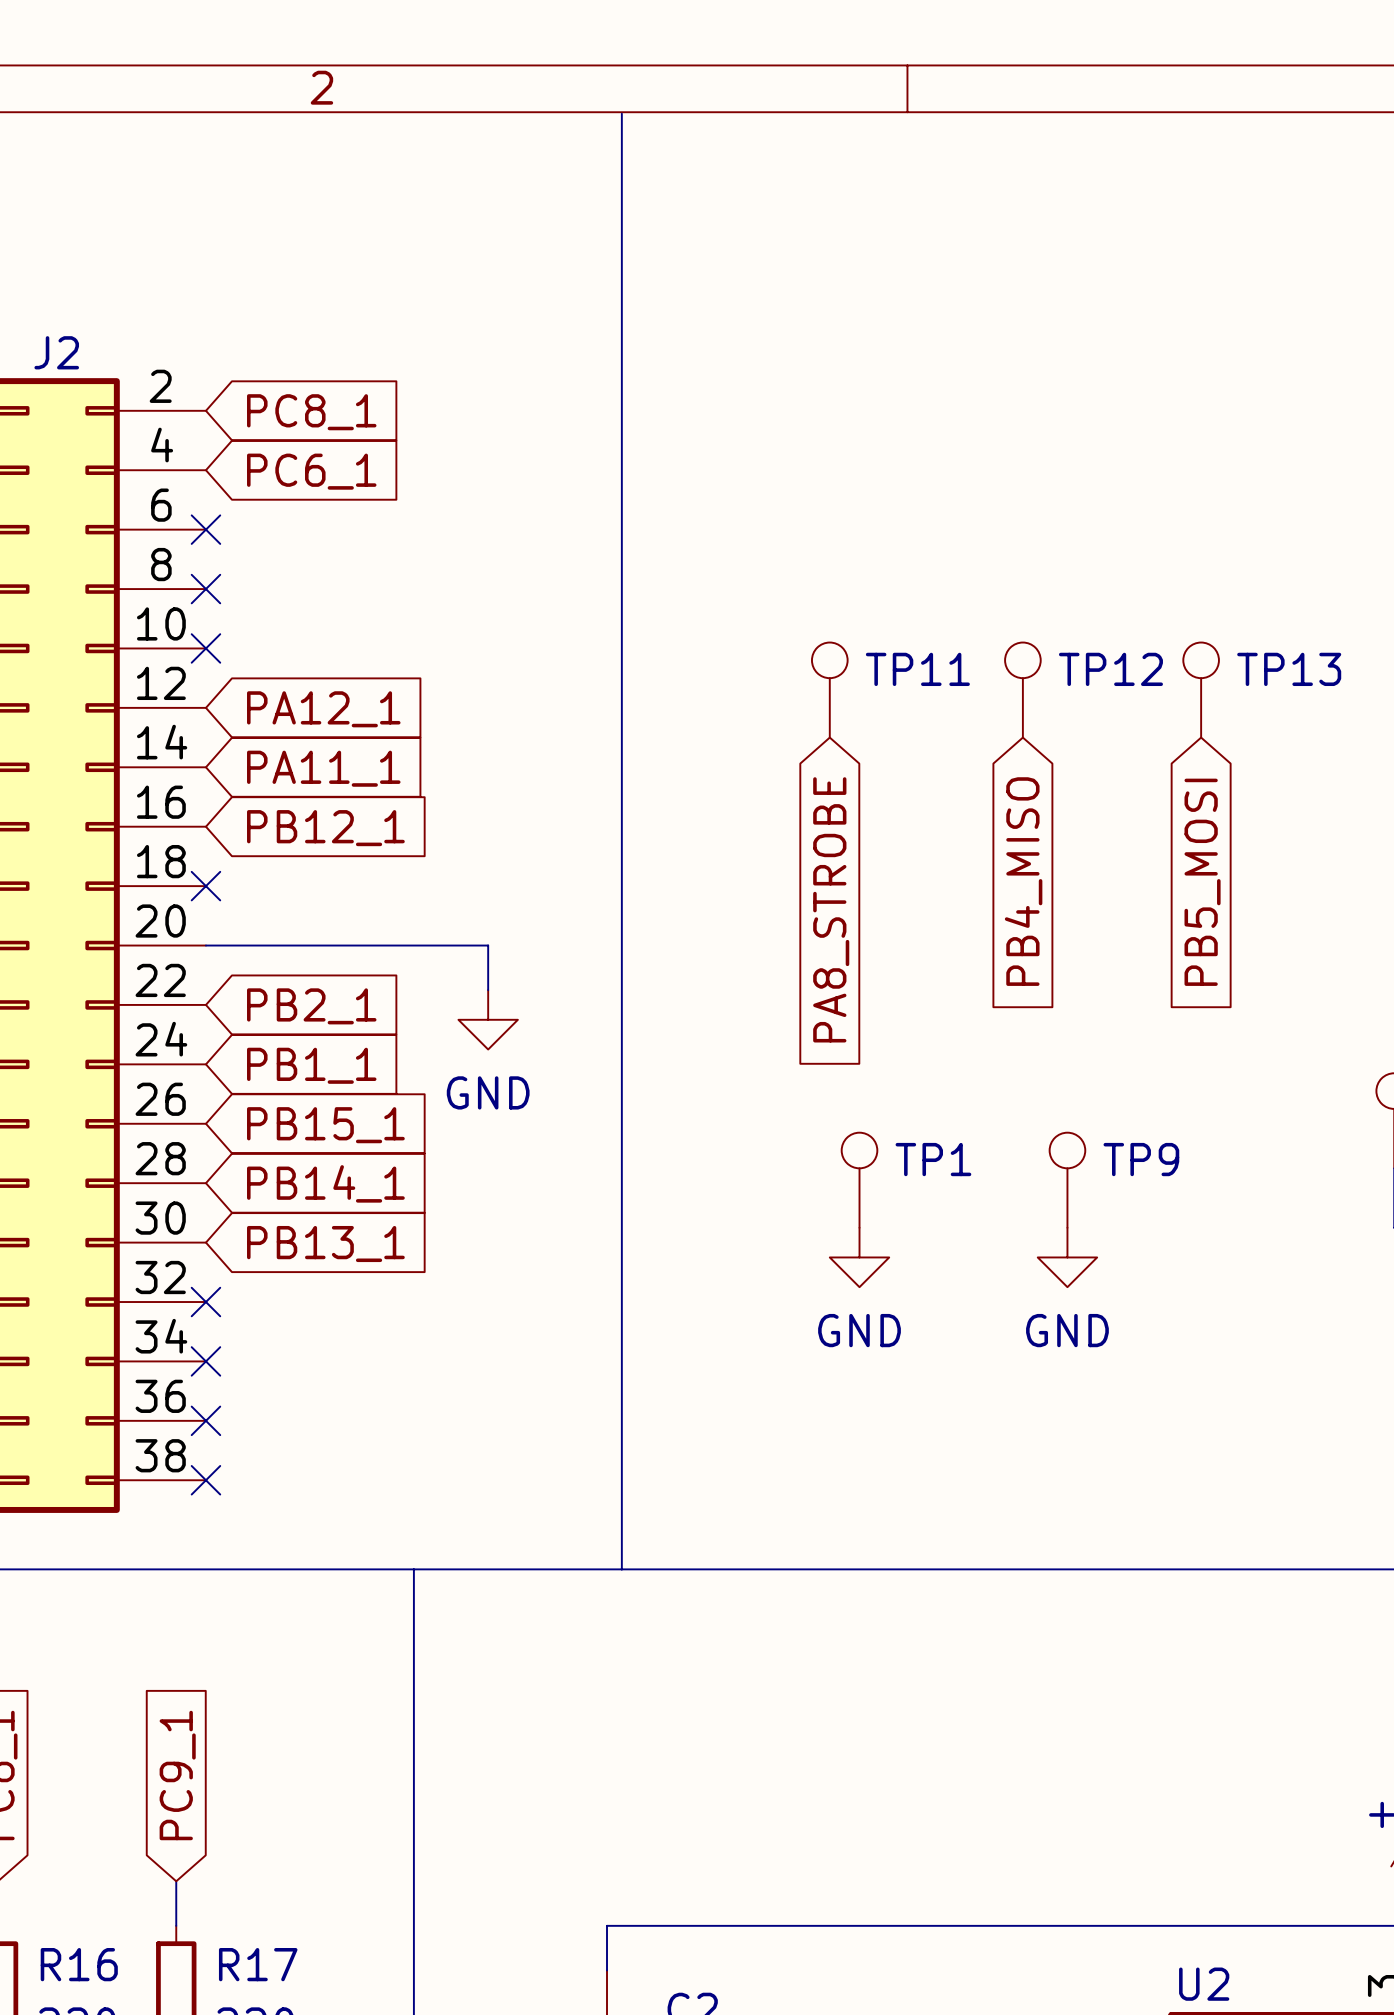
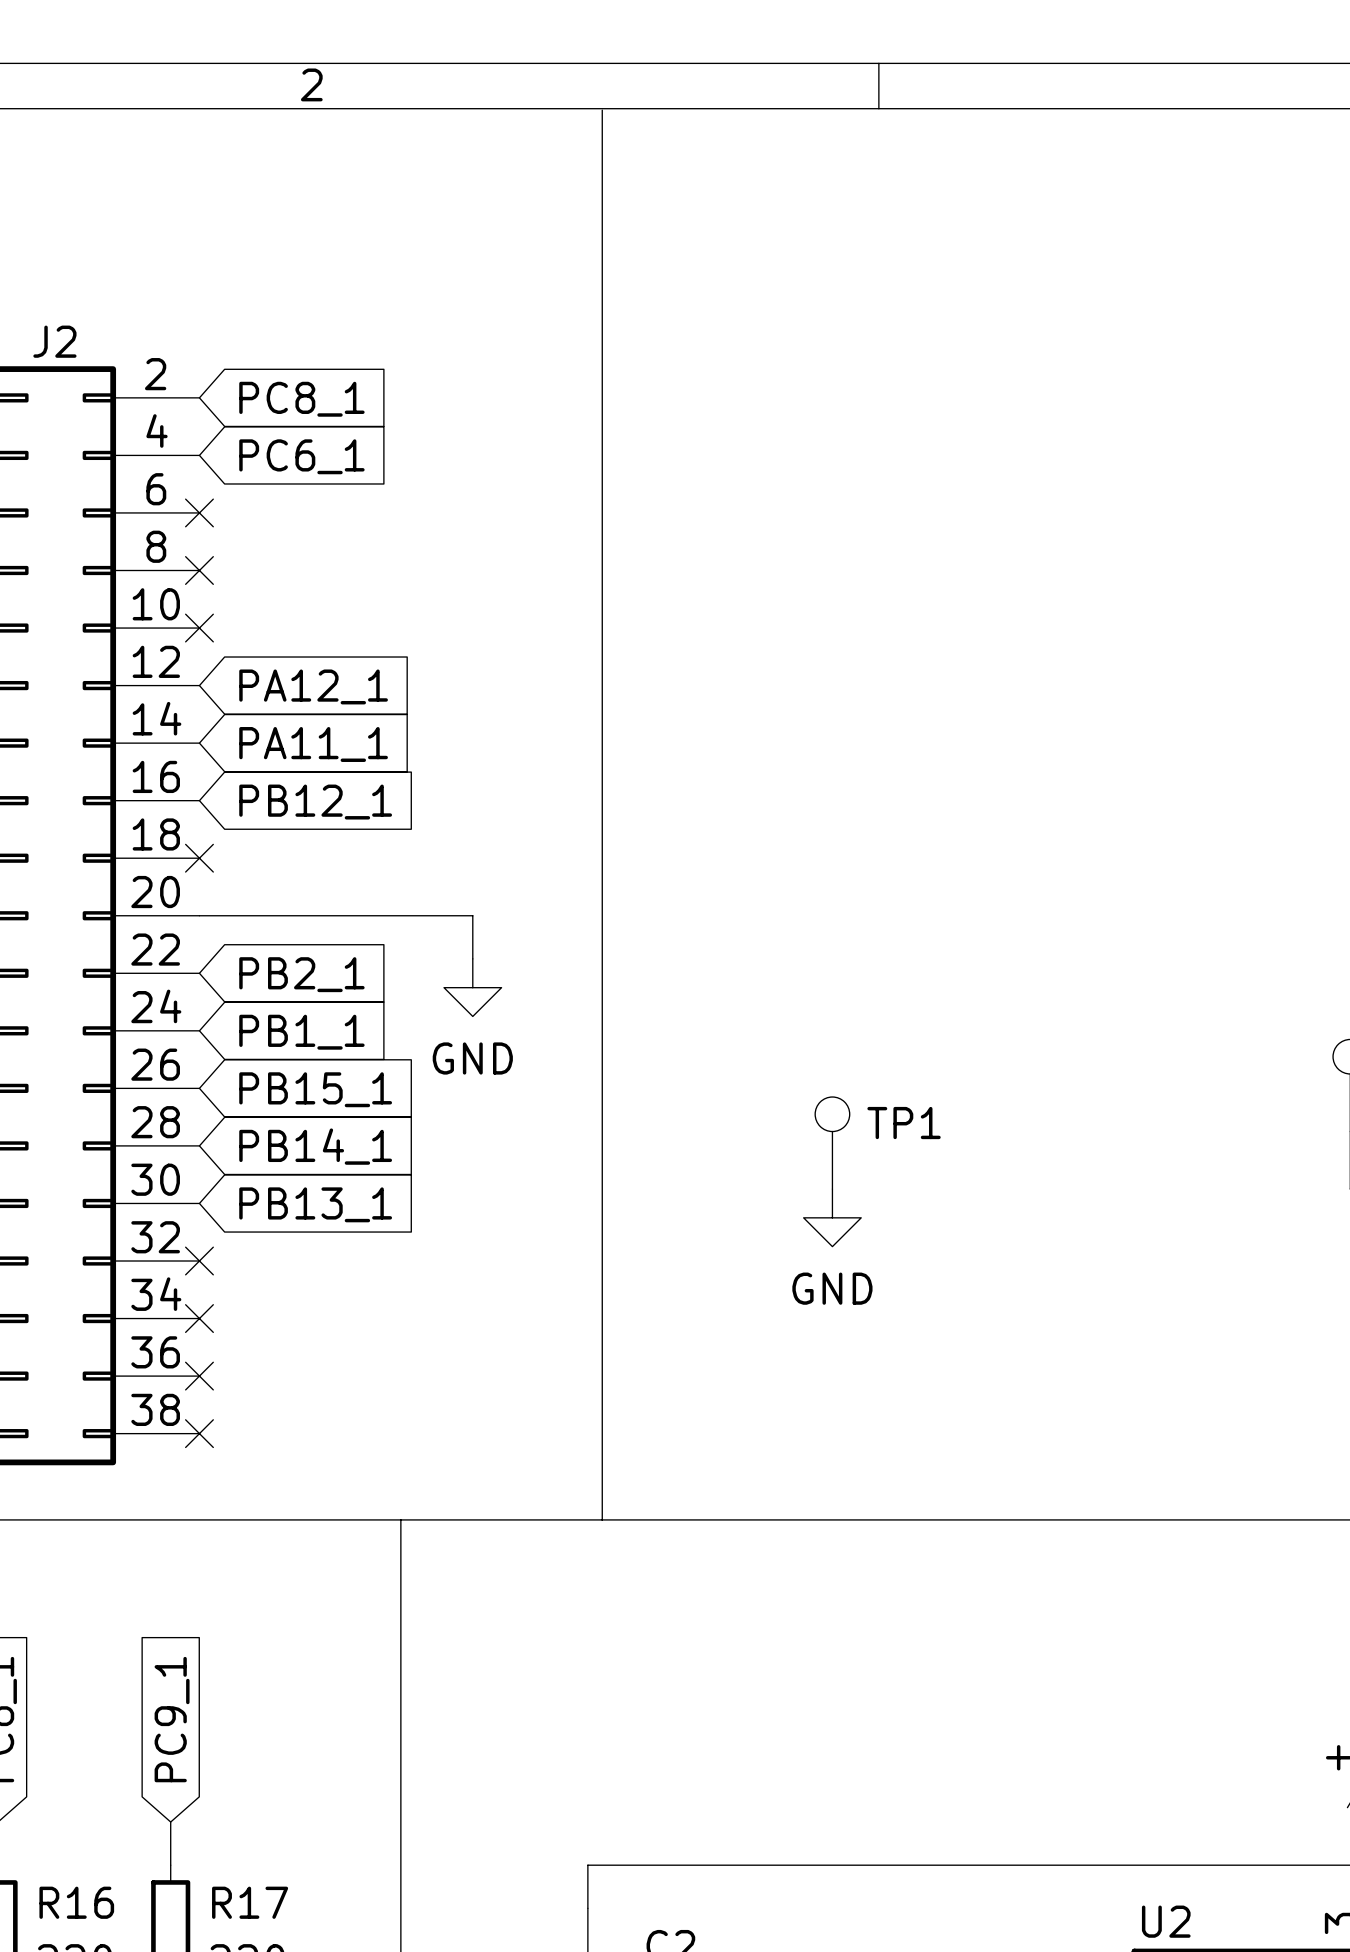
TP11: (829, 690) -> none
TP12: (1022, 690) -> none
TP13: (1201, 690) -> none
global label: PB4_MISO (1023, 881) -> none
global label: PB5_MOSI (1202, 882) -> none
global label: PA8_STROBE (831, 909) -> none
TP9: (1067, 1180) -> none
power symbol: GND (1067, 1257) -> none

